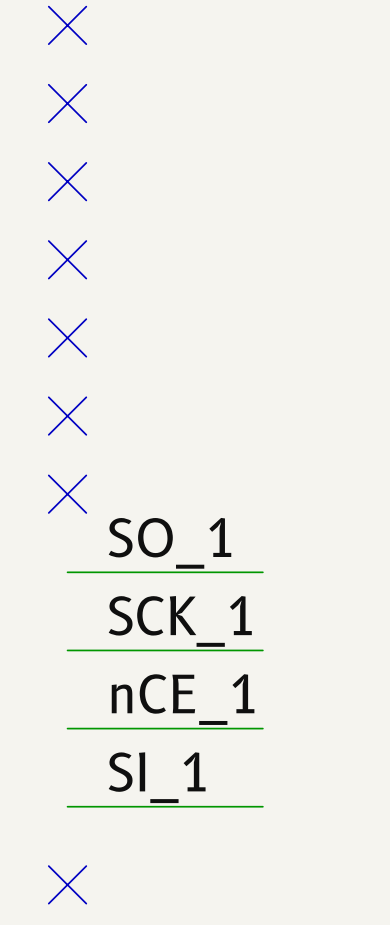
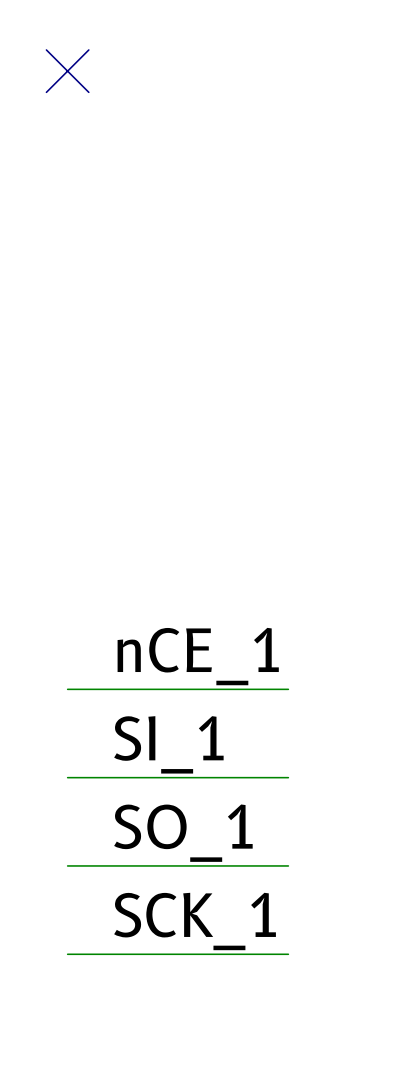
no-connect mark: (67, 103) -> none
no-connect mark: (67, 181) -> none
no-connect mark: (67, 259) -> none
no-connect mark: (67, 337) -> none
no-connect mark: (67, 416) -> none
no-connect mark: (67, 494) -> none
label: SO_1 (169, 543) -> nCE_1 (198, 656)
label: SCK_1 (180, 621) -> SI_1 (168, 744)
label: nCE_1 (183, 699) -> SO_1 (183, 833)
label: SI_1 (157, 777) -> SCK_1 (195, 921)
no-connect mark: (67, 884) -> none

